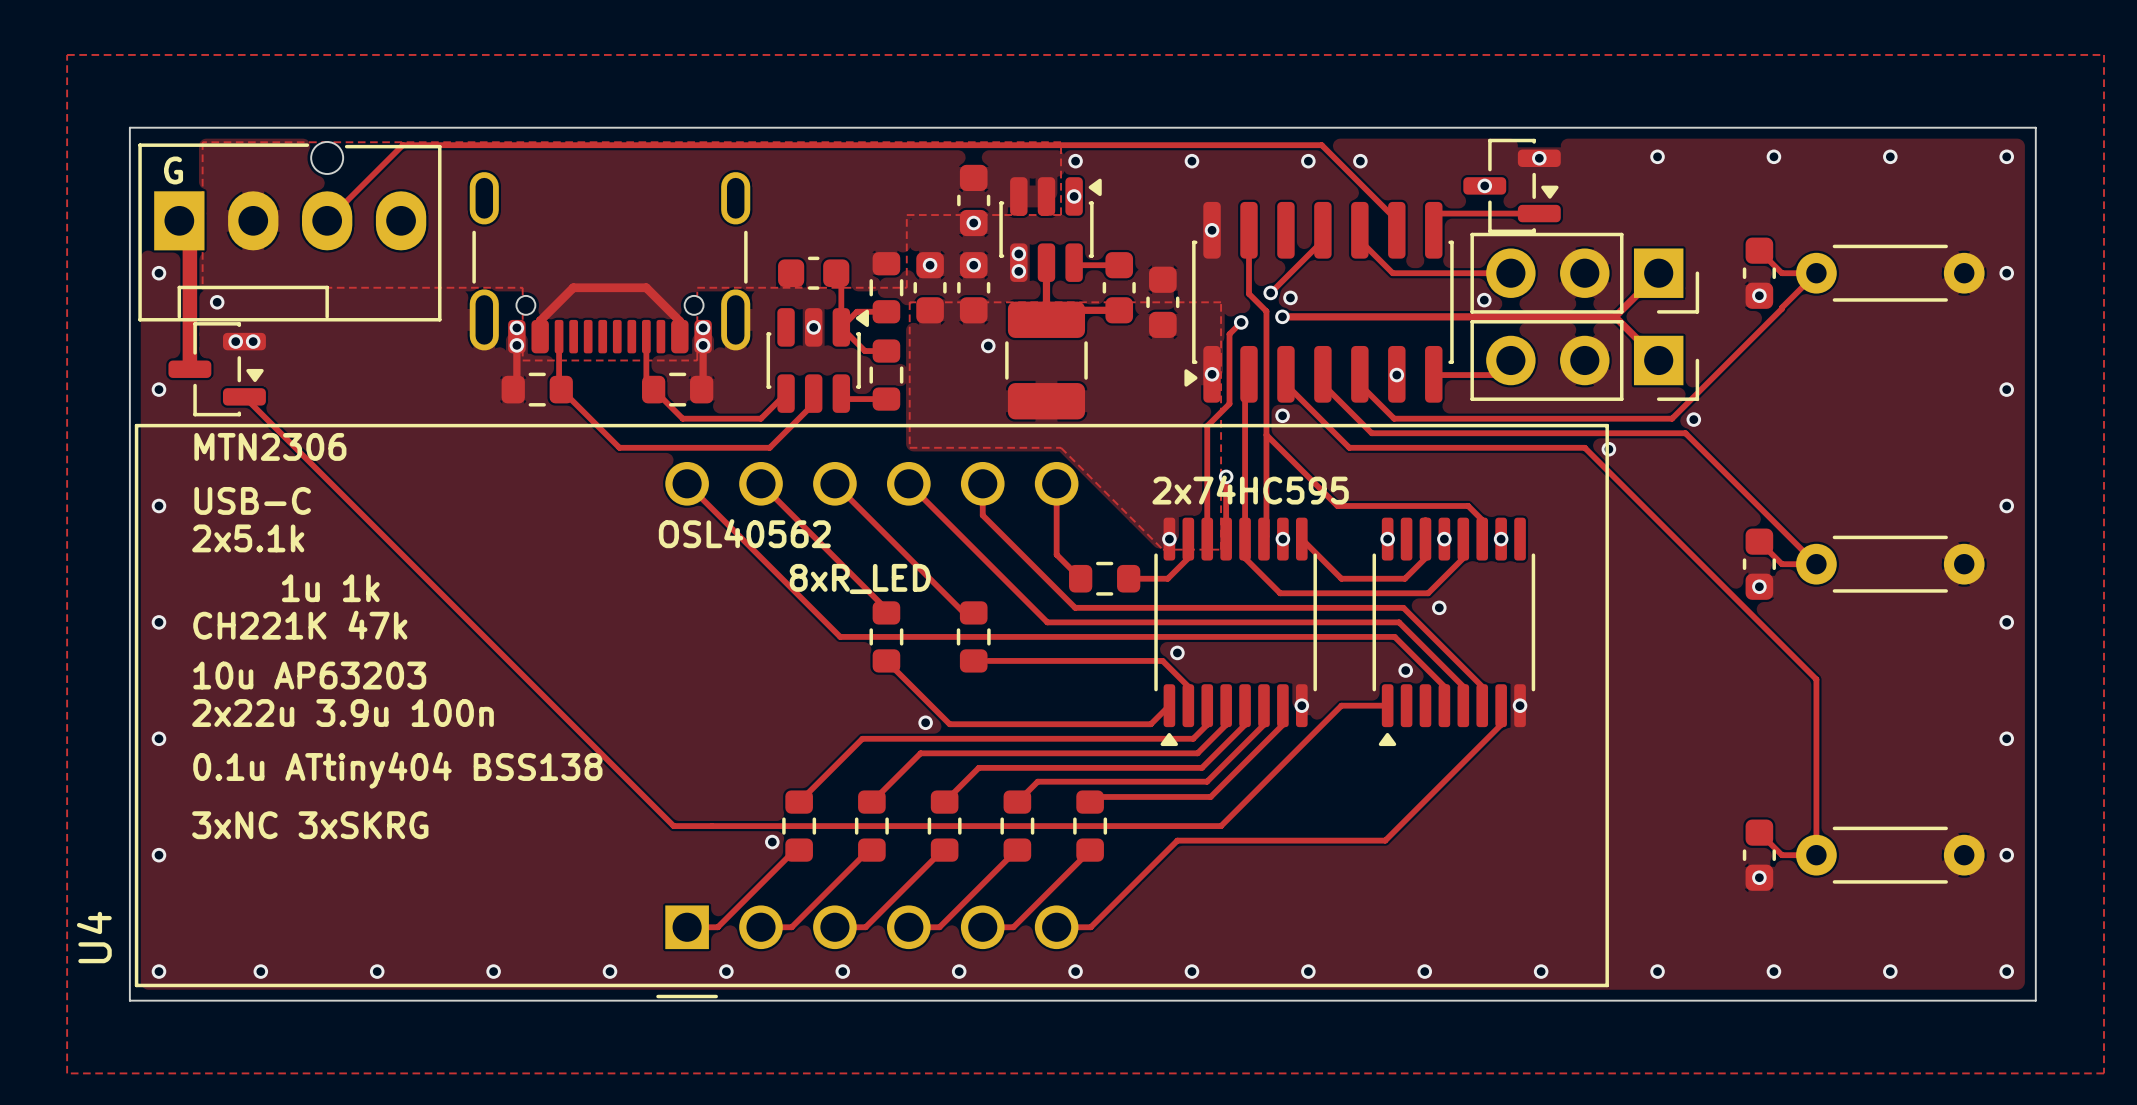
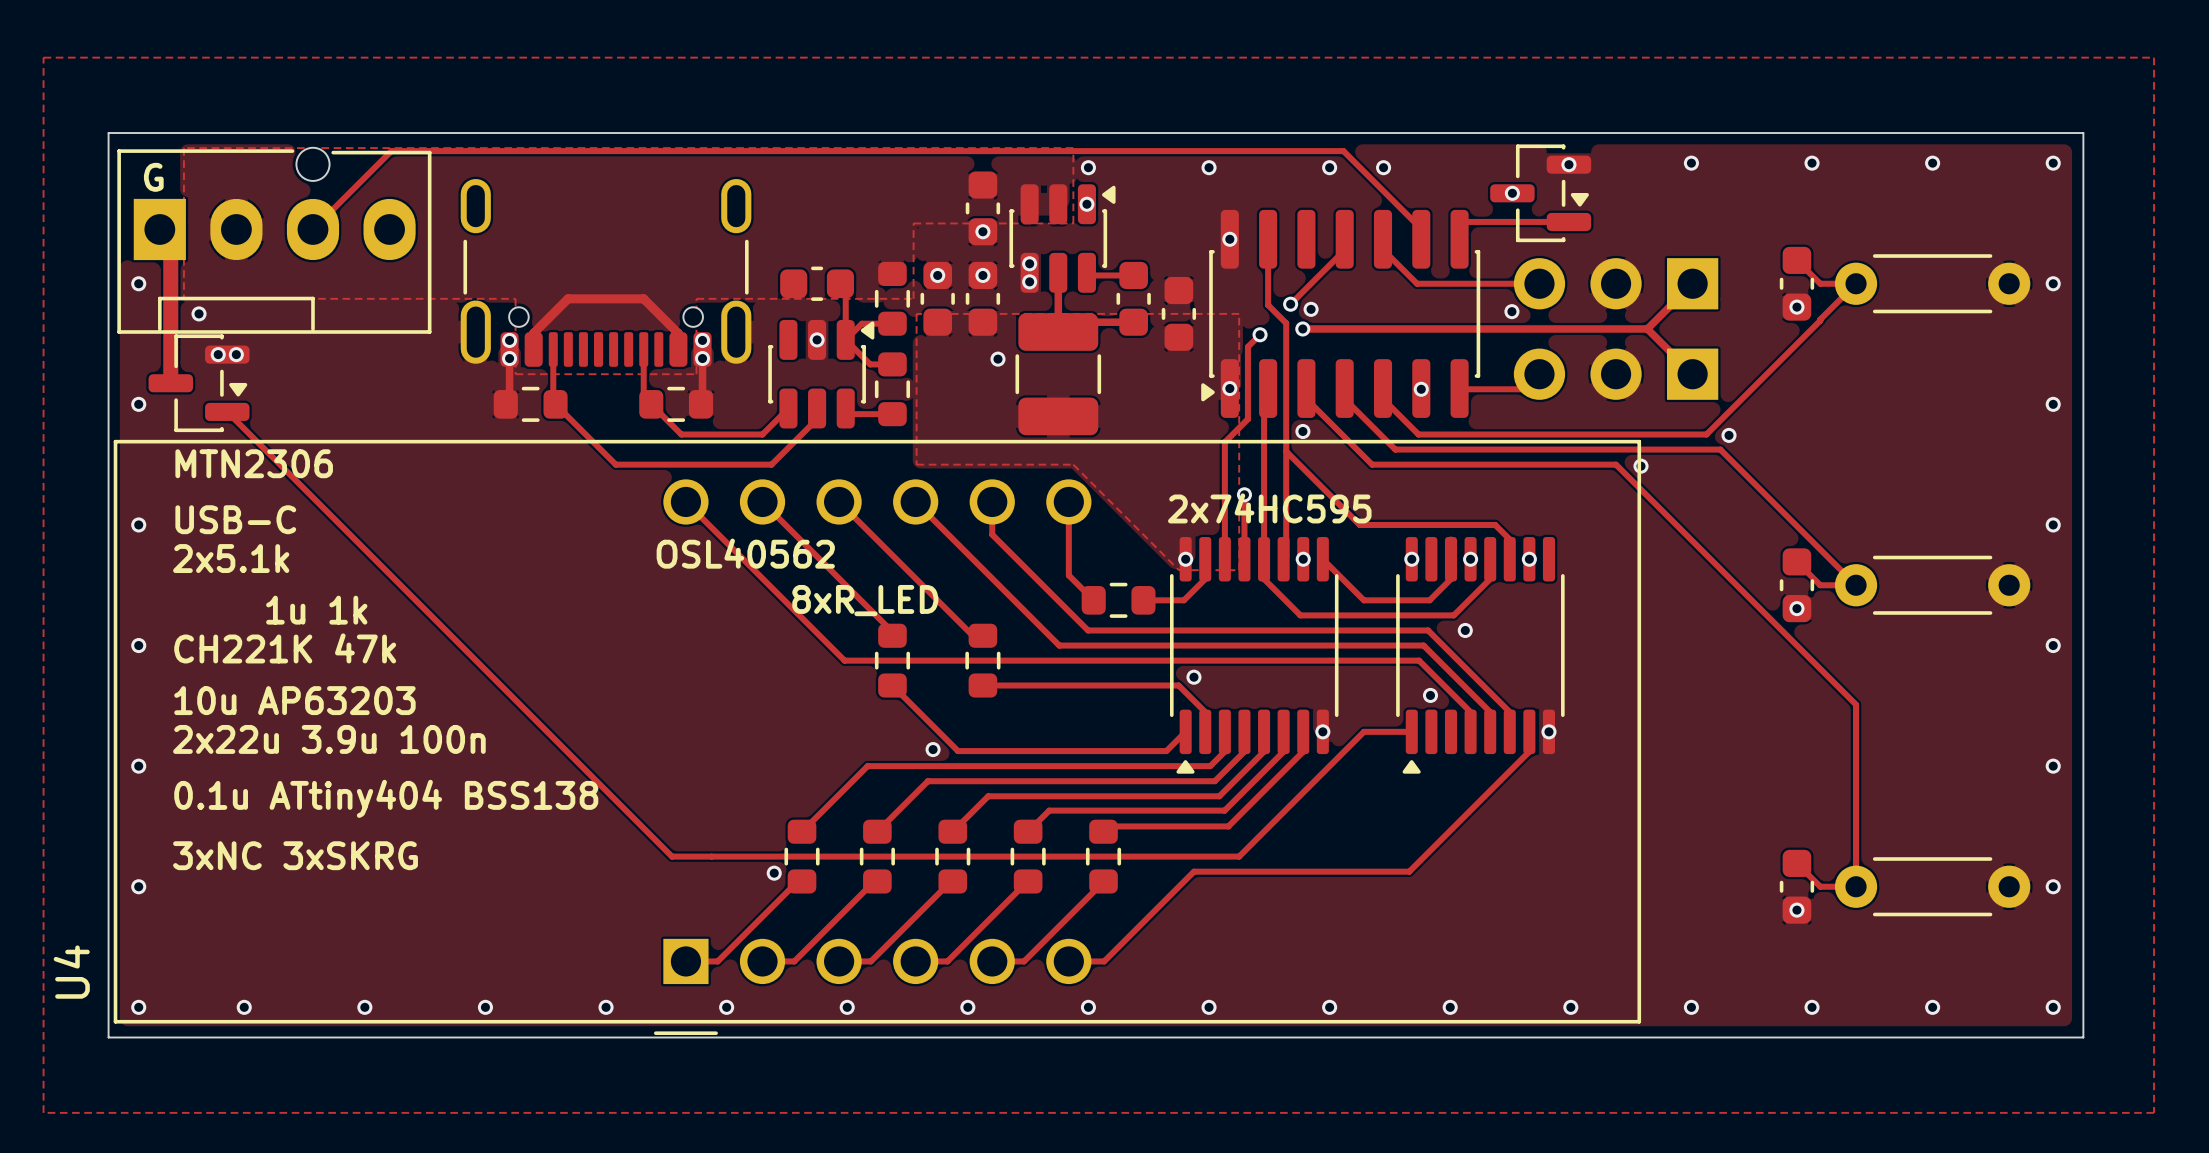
part footprint: [1470, 232, 1700, 314] -> [1513, 258, 1719, 310]
part footprint: [1470, 320, 1700, 401] -> [1513, 348, 1719, 400]

